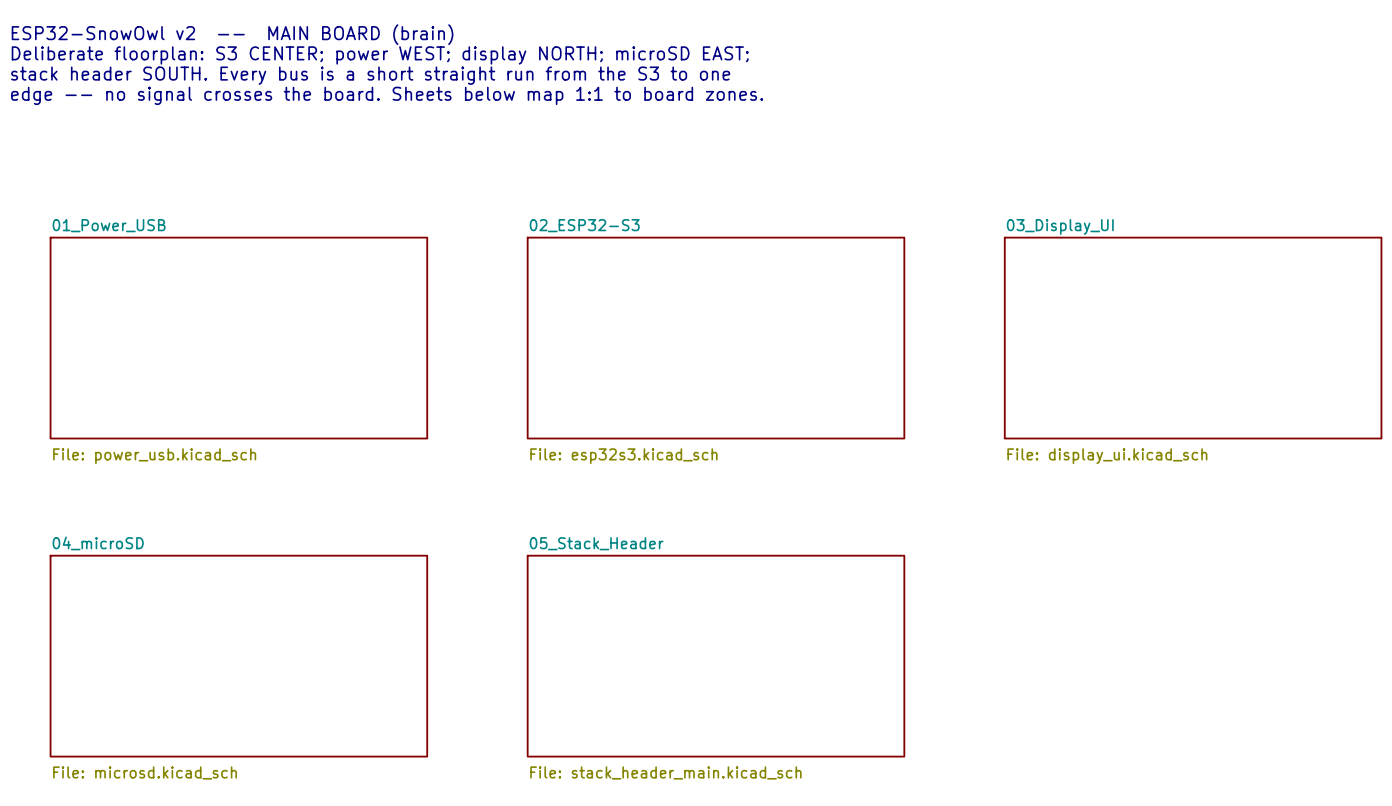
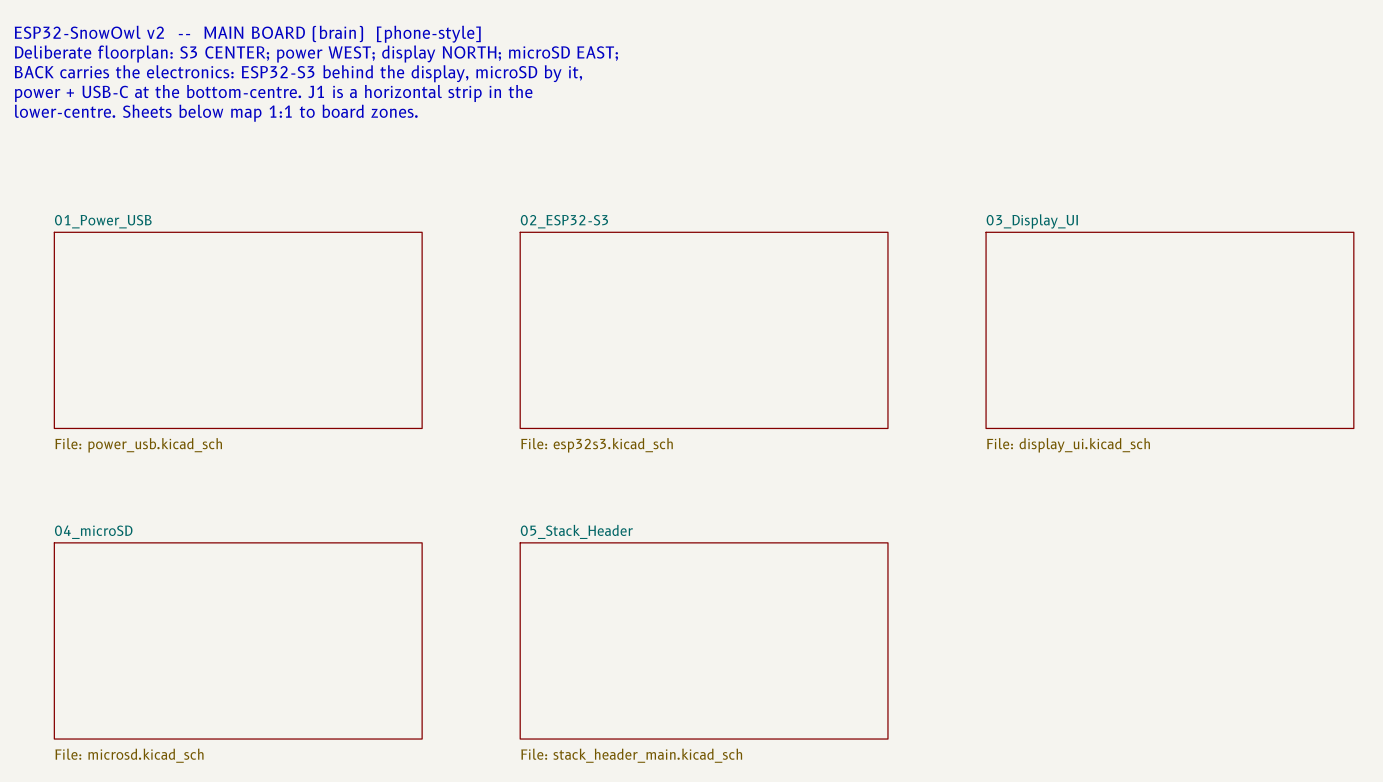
text: ESP32-SnowOwl v2 -- MAIN BOARD (brain) (232, 34) -> ESP32-SnowOwl v2 -- MAIN BOARD (brain) [phone-style] (247, 34)
text: stack header SOUTH. Every bus is a short straight run from the S3 to one (370, 75) -> BACK carries the electronics: ESP32-S3 behind the display, microSD by it, (298, 73)
text: edge -- no signal crosses the board. Sheets below map 1:1 to board zones. (387, 95) -> power + USB-C at the bottom-centre. J1 is a horizontal strip in the (273, 93)
text: none -> lower-centre. Sheets below map 1:1 to board zones. (216, 113)

